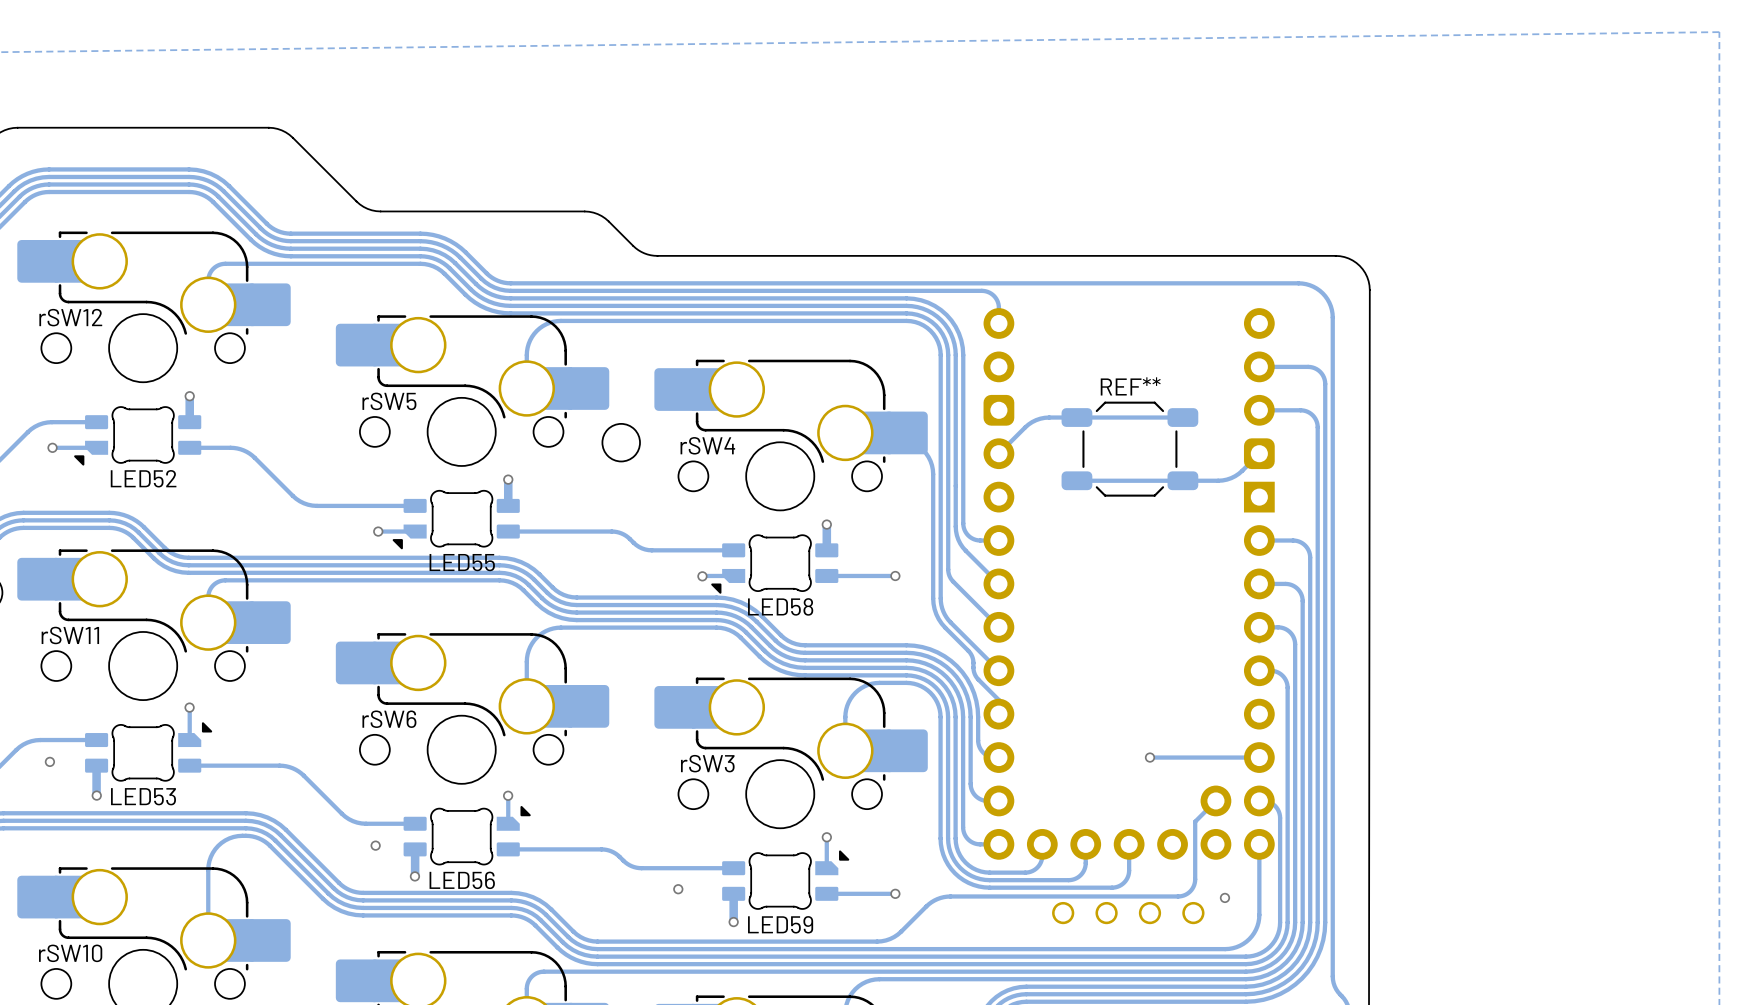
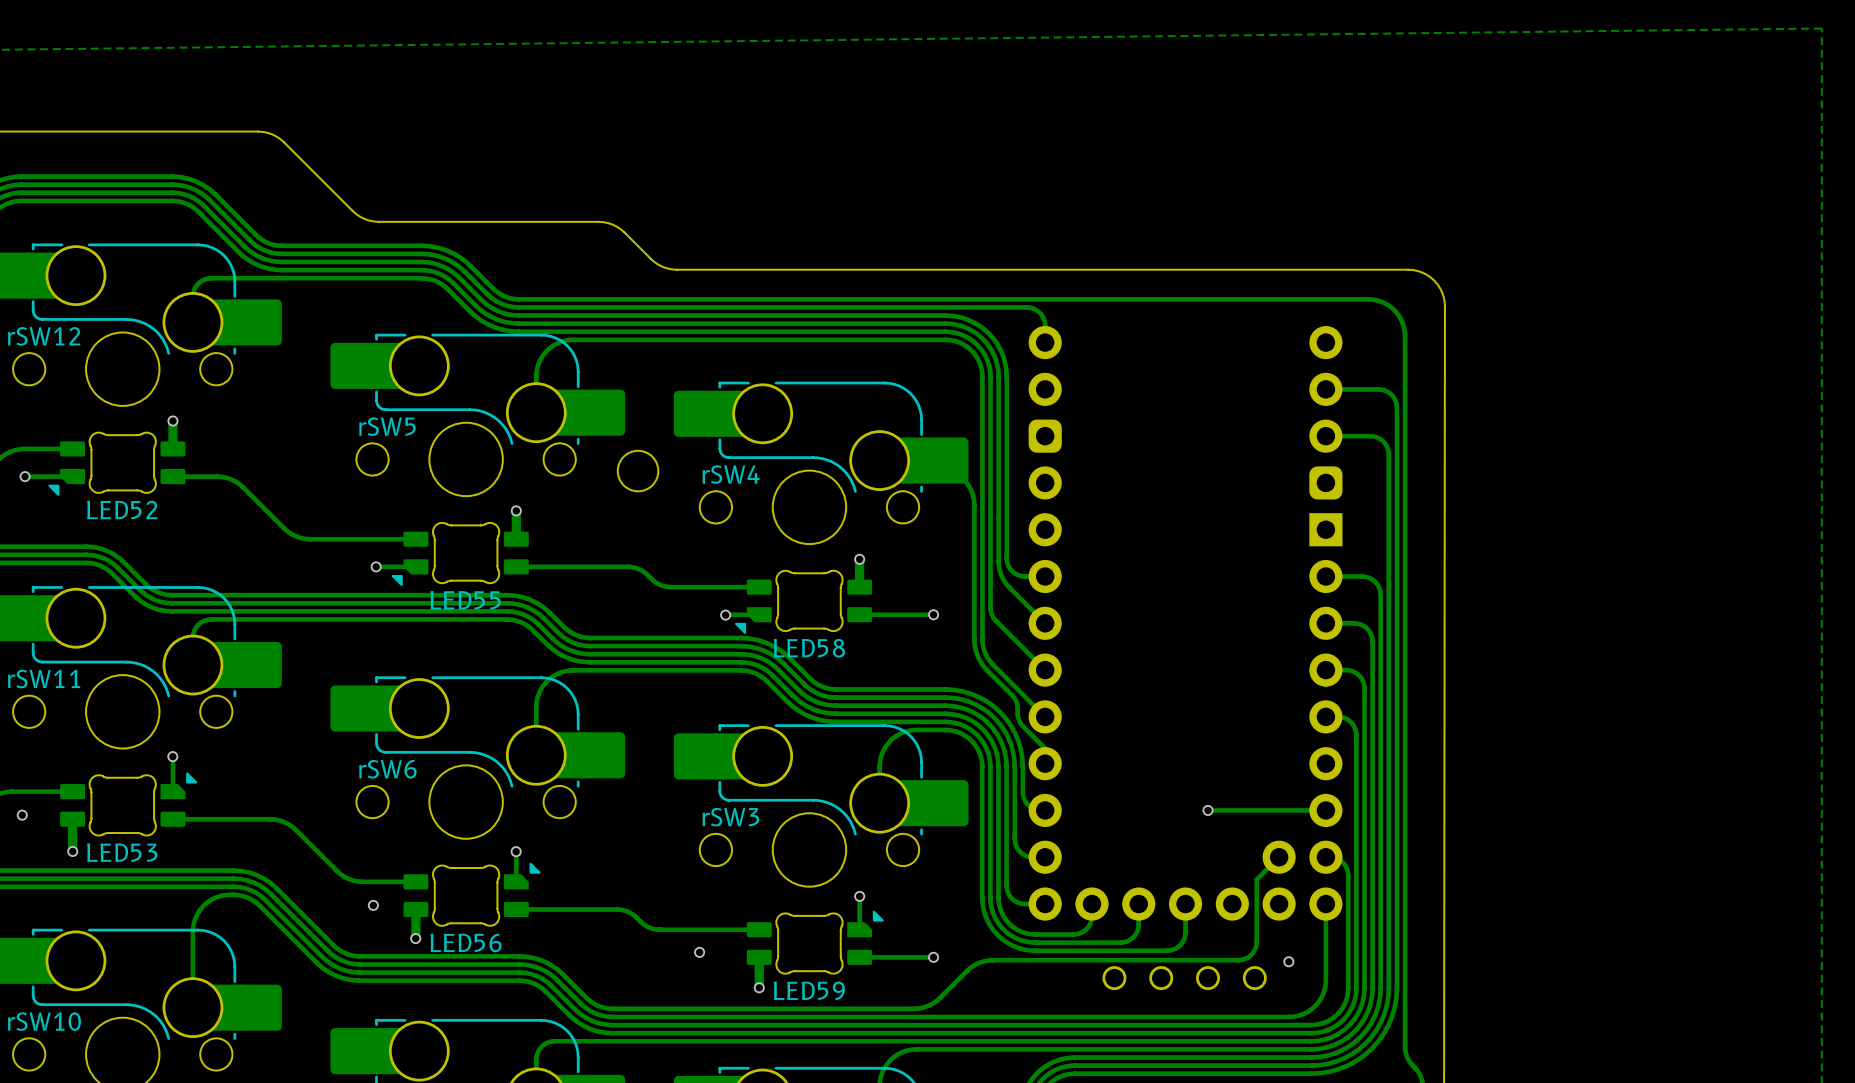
track: (1182, 417) (1044, 417) (1028, 424) (998, 453) -> none
REF**: (1129, 449) -> none
track: (1259, 453) (1238, 473) (1222, 480) (1076, 480) -> none

